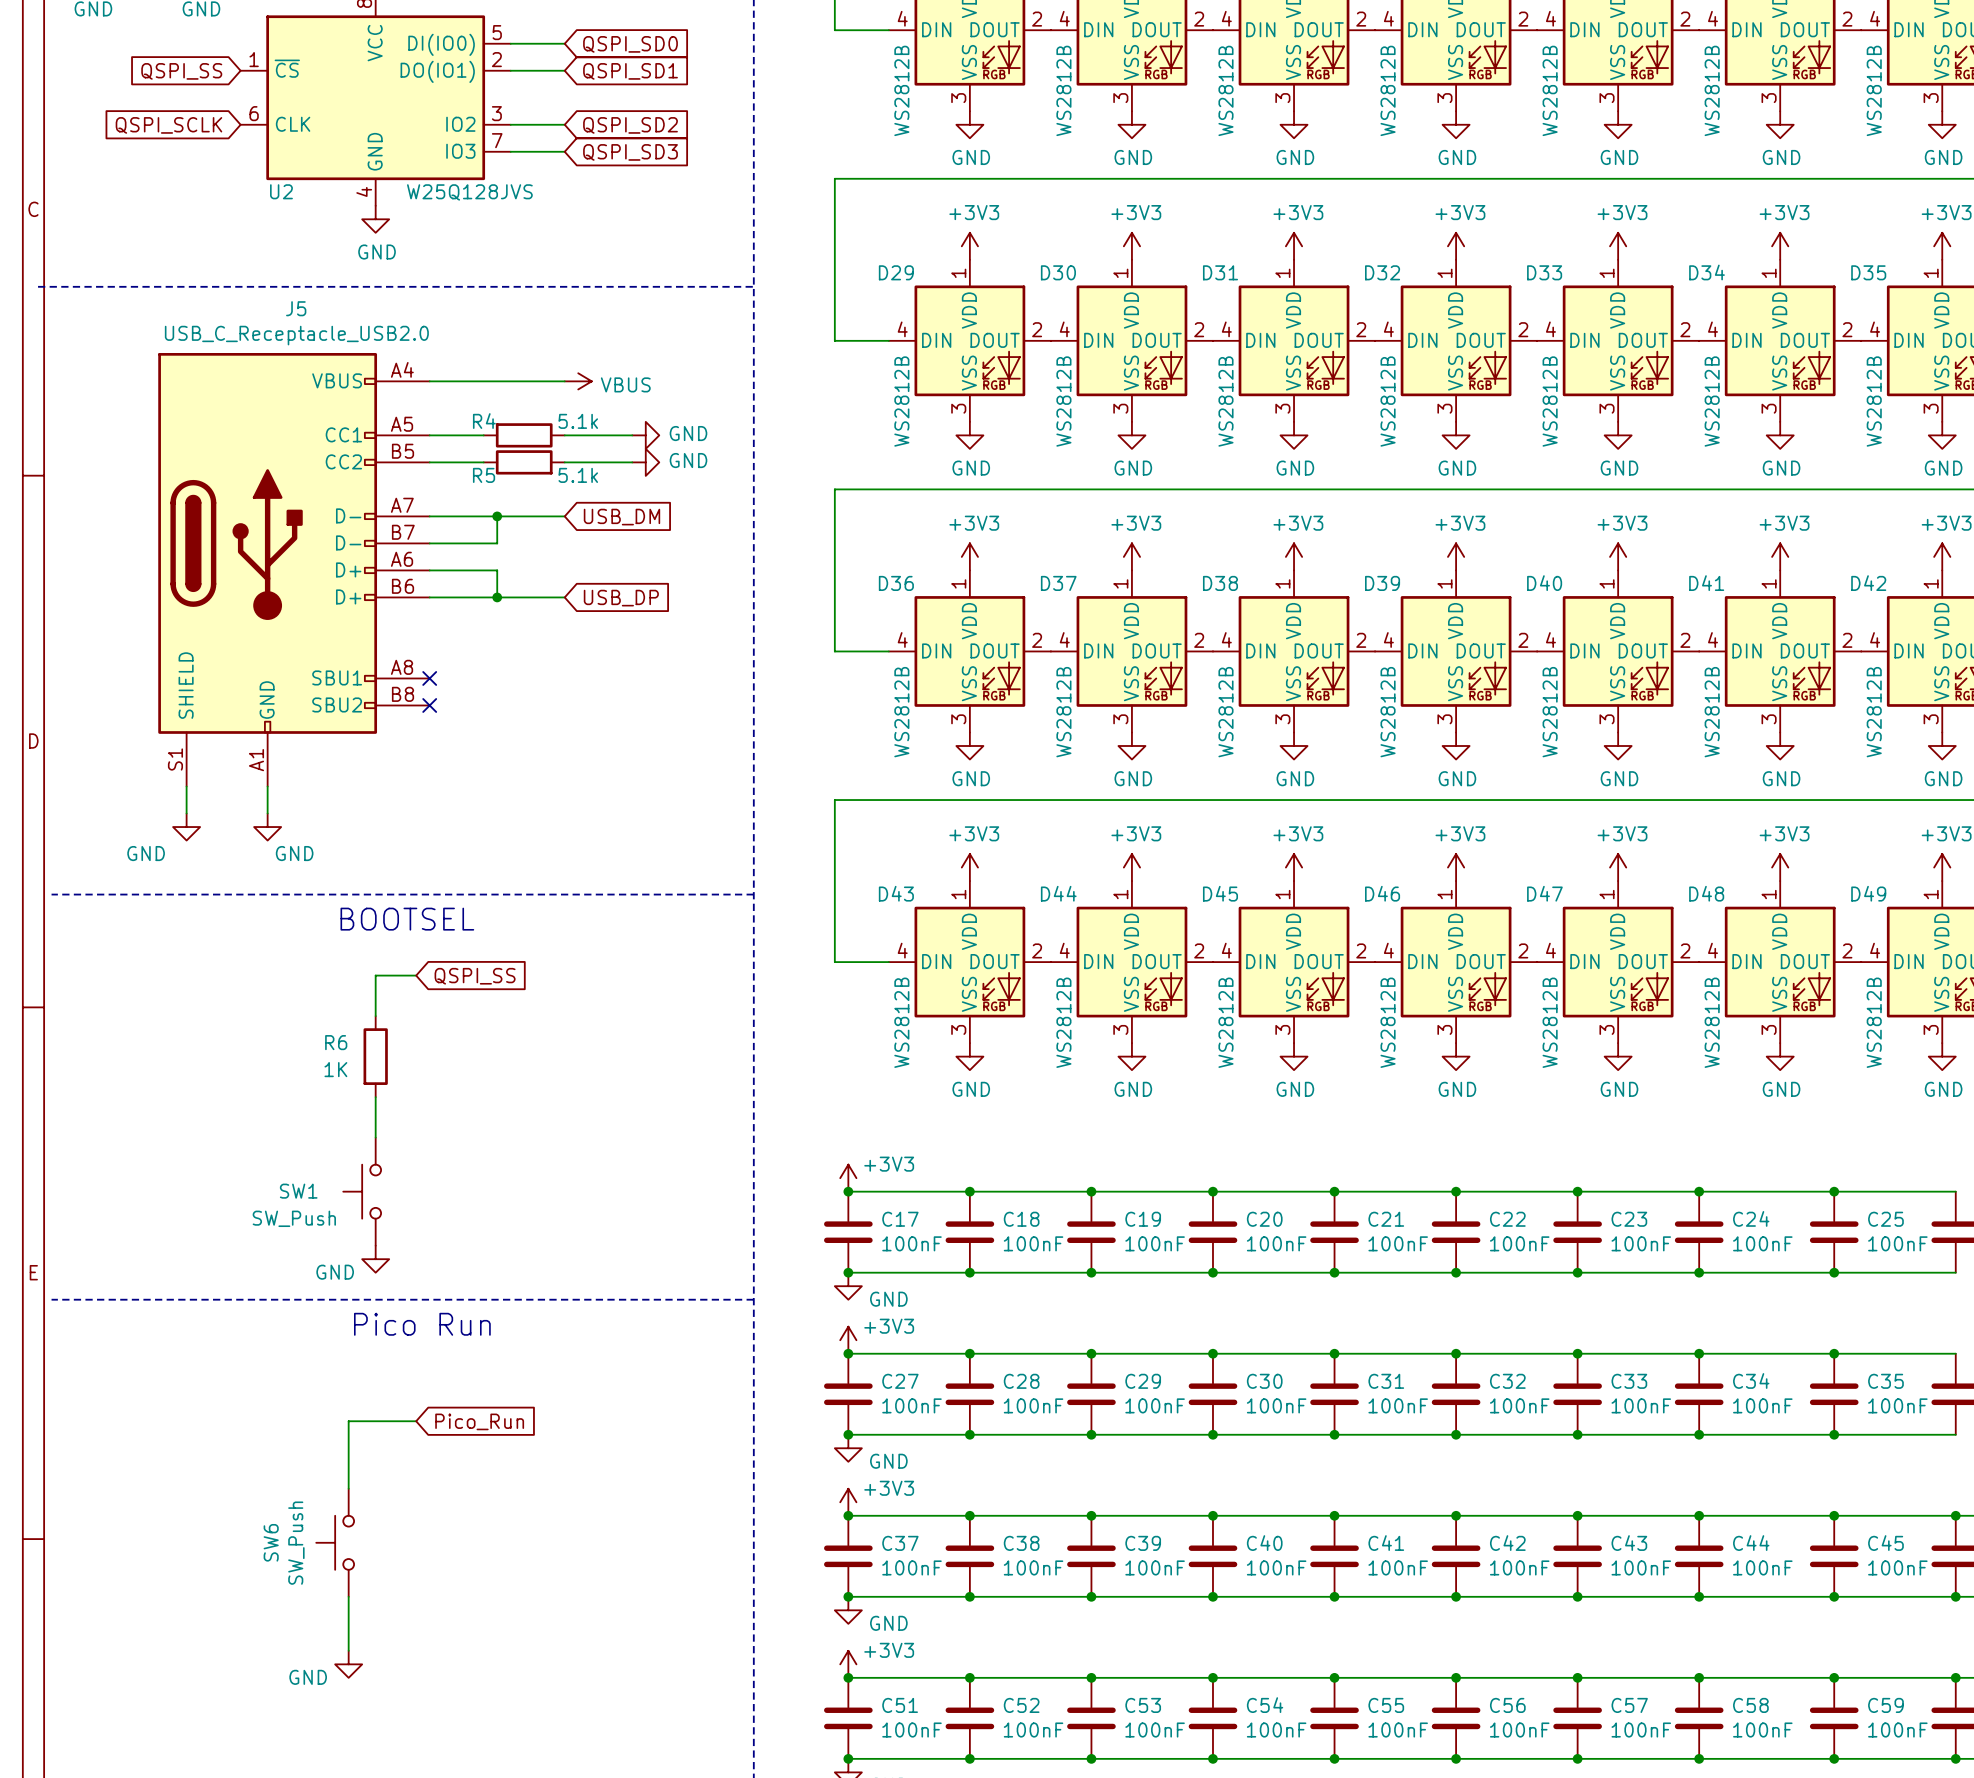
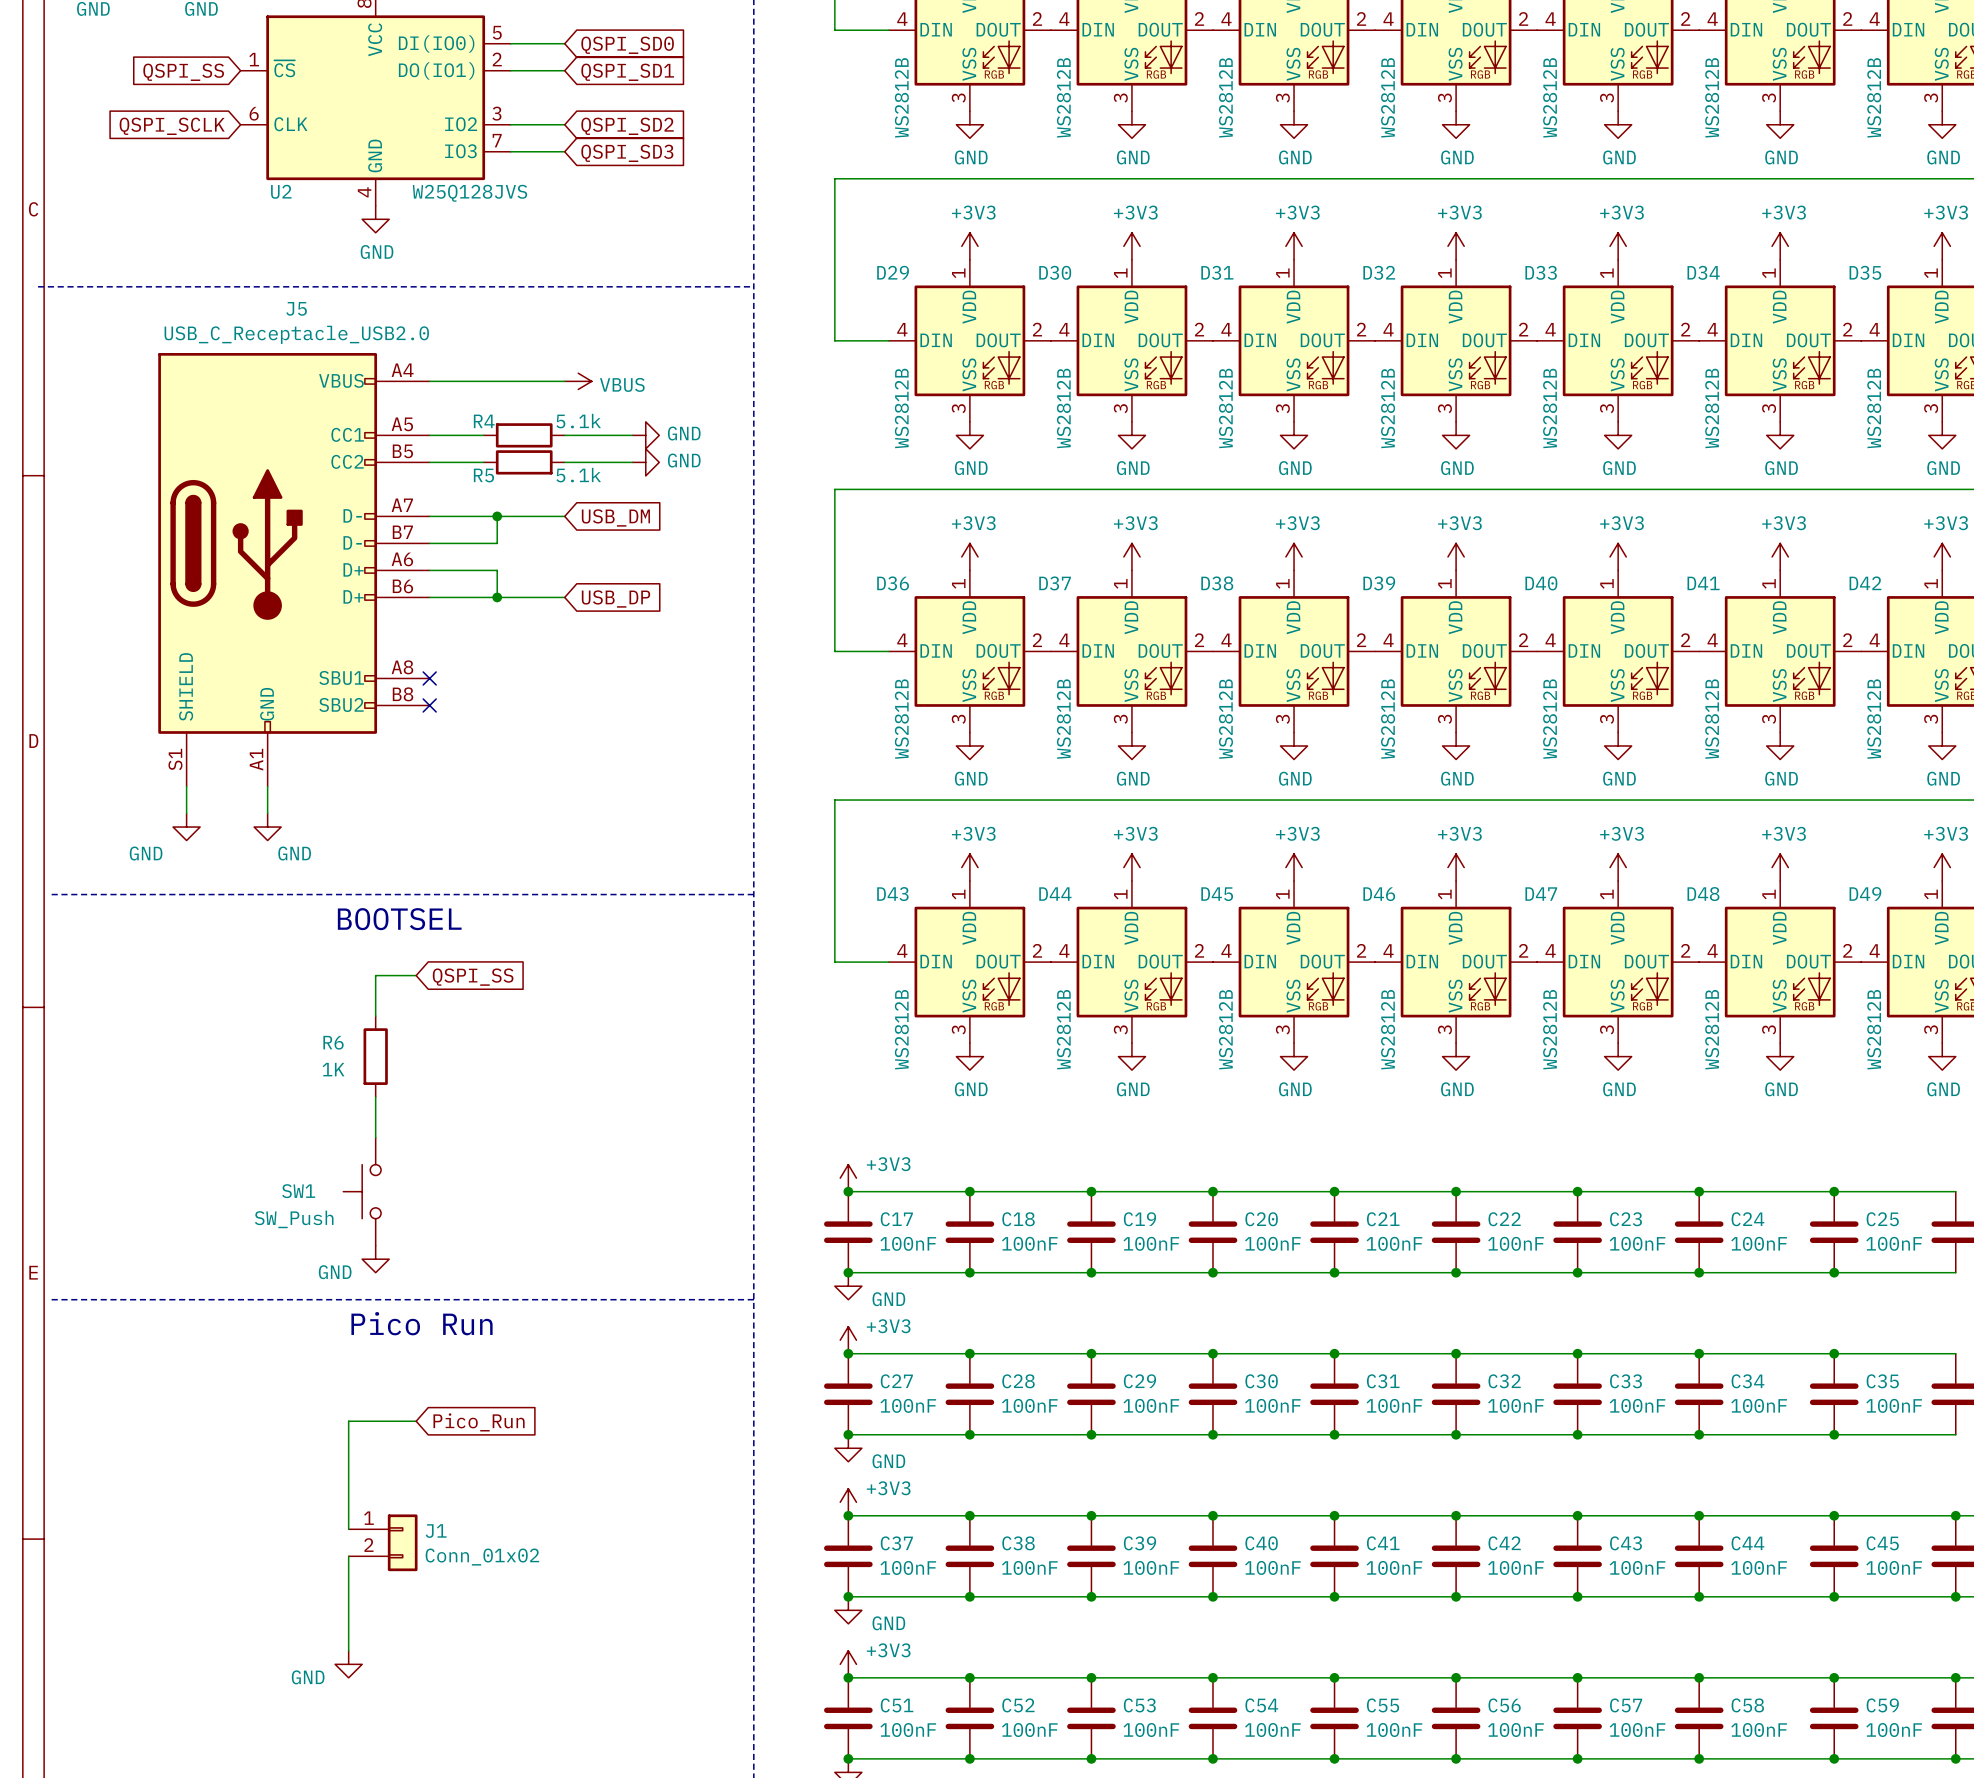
SW6: SW_Push (335, 1542) -> none
J1: none -> Conn_01x02 (383, 1542)

